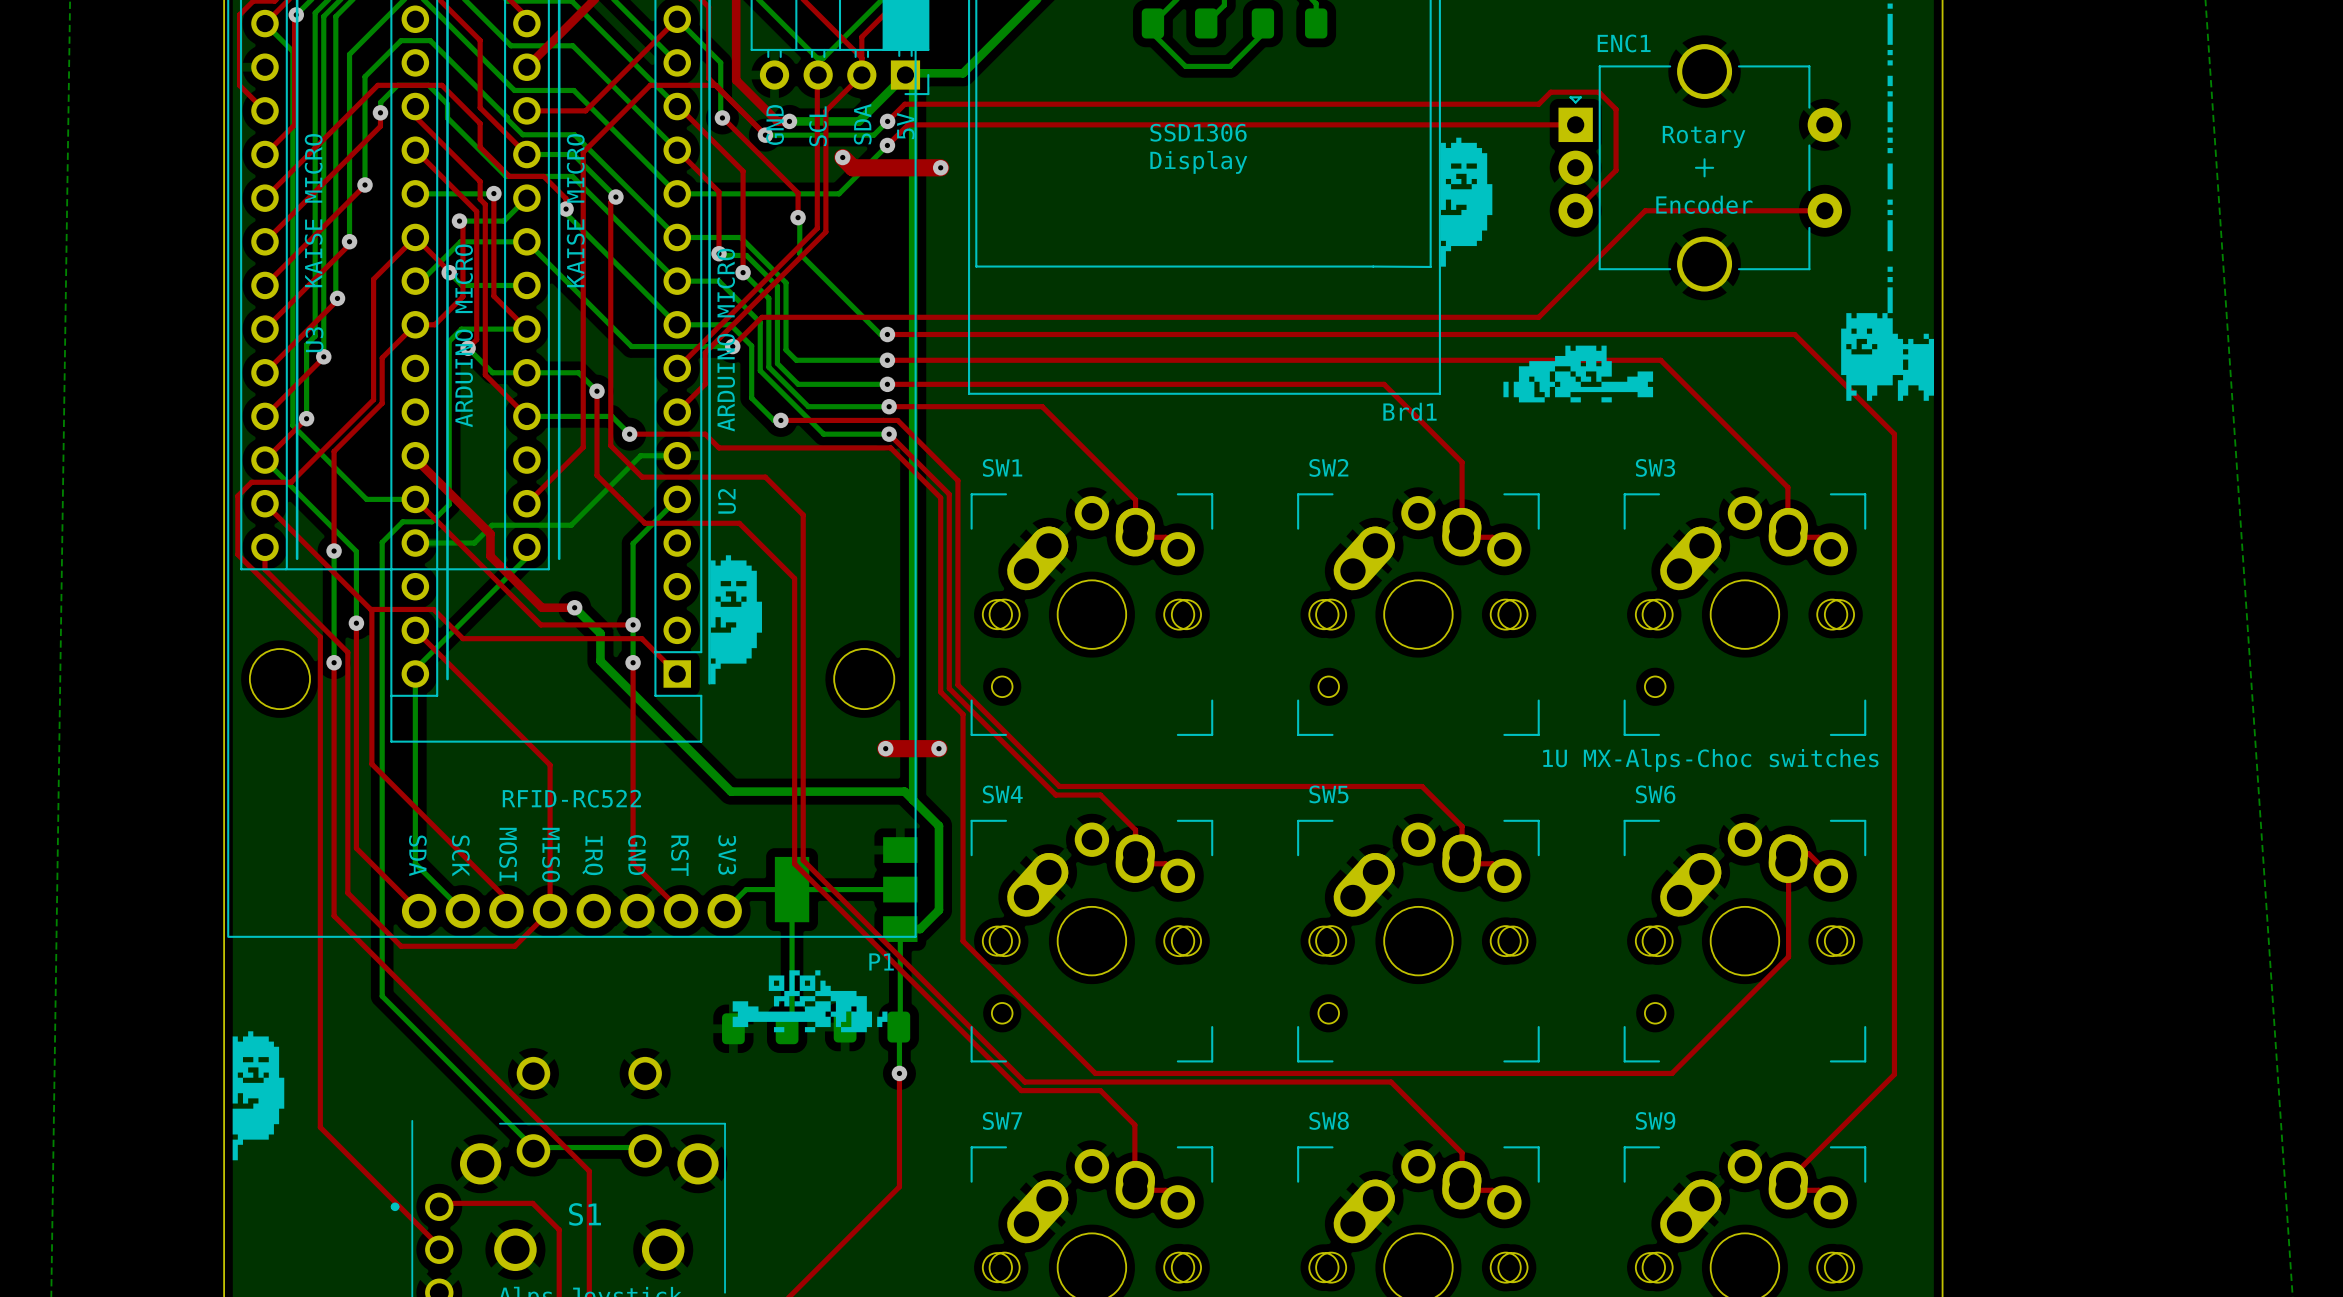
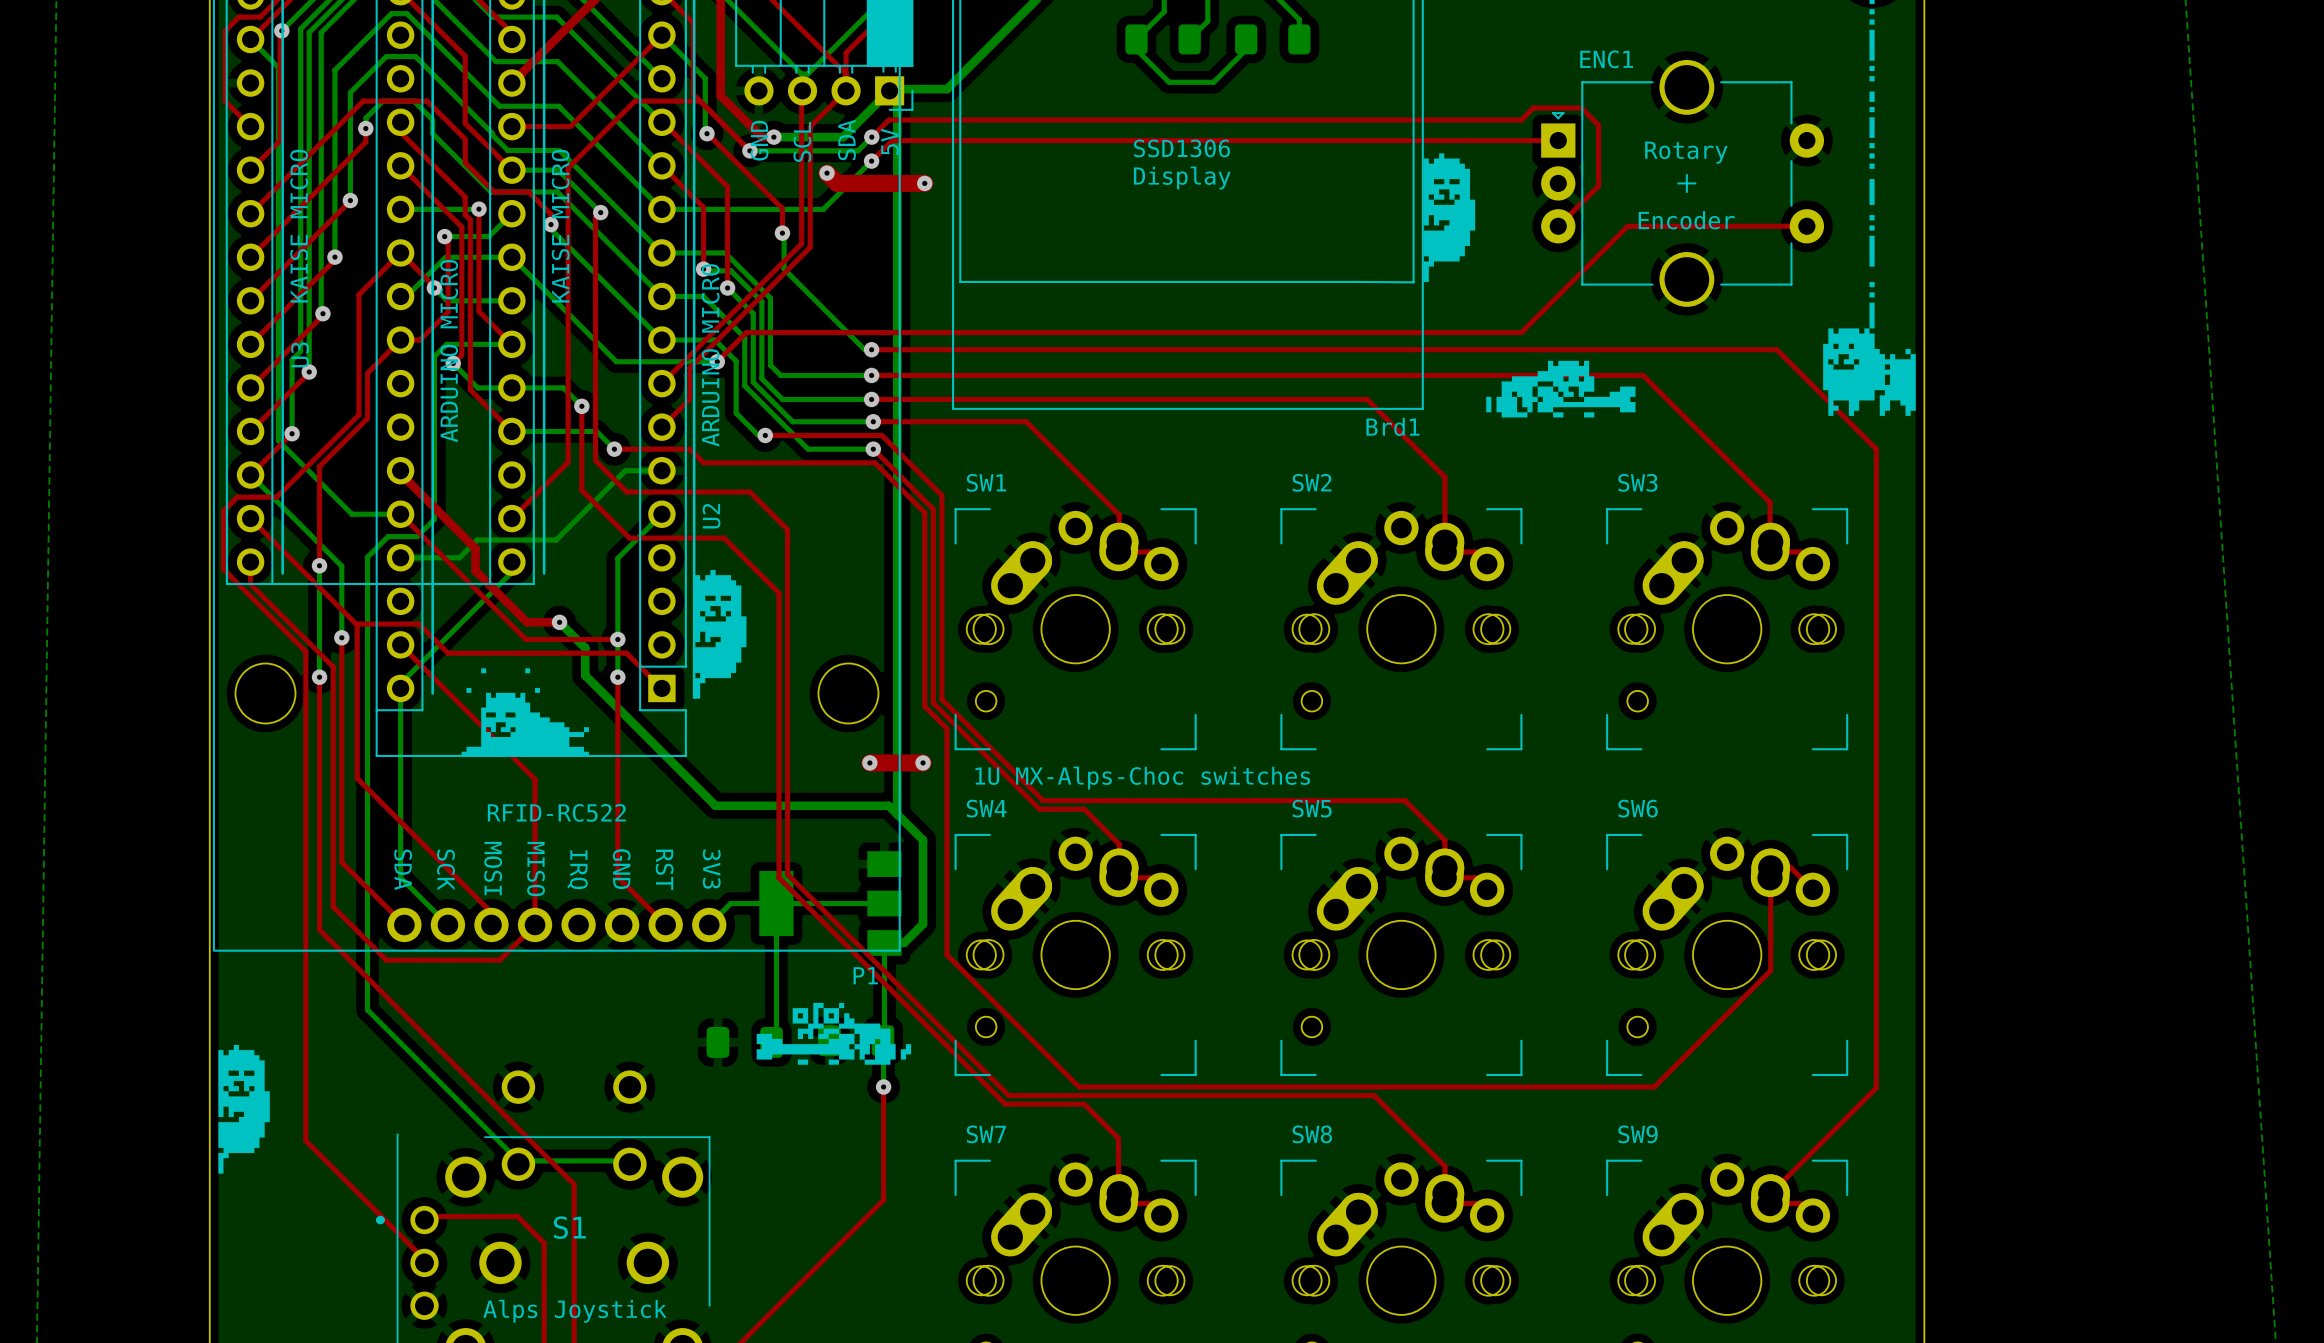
drawing: none -> [461, 668, 589, 757]
text: 1U MX-Alps-Choc switches (1710, 760) -> none
text: none -> 1U MX-Alps-Choc switches (1142, 778)
drawing position: (810, 1001) -> (833, 1033)

